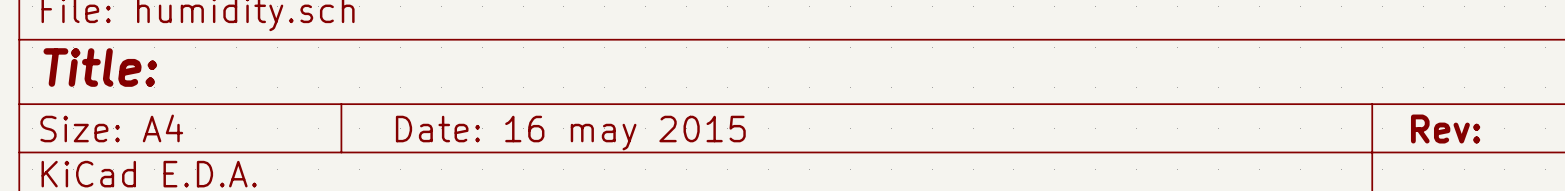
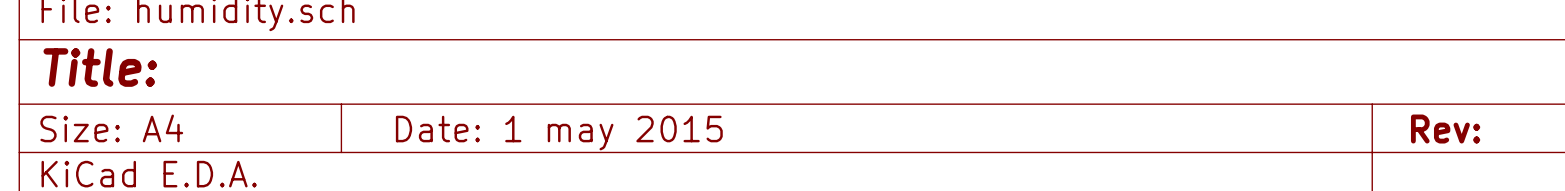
title block: Date: 16 may 2015 (570, 133) -> Date: 1 may 2015 (559, 133)

